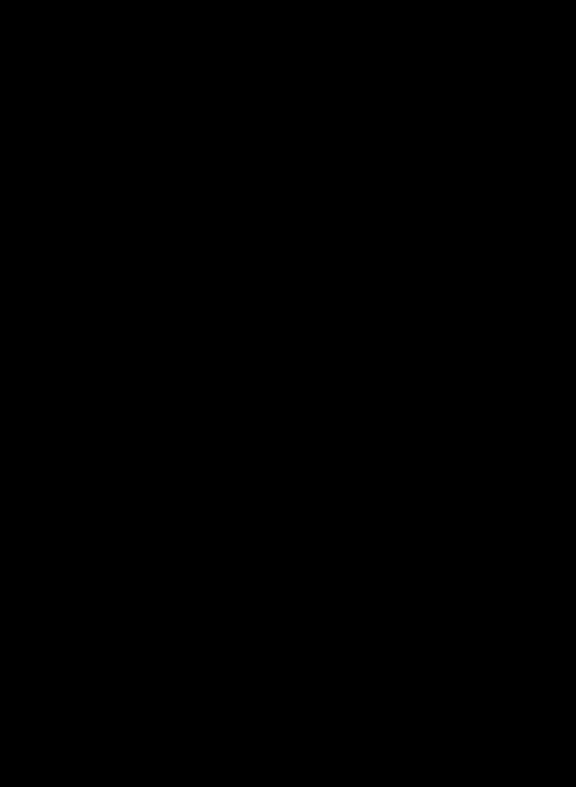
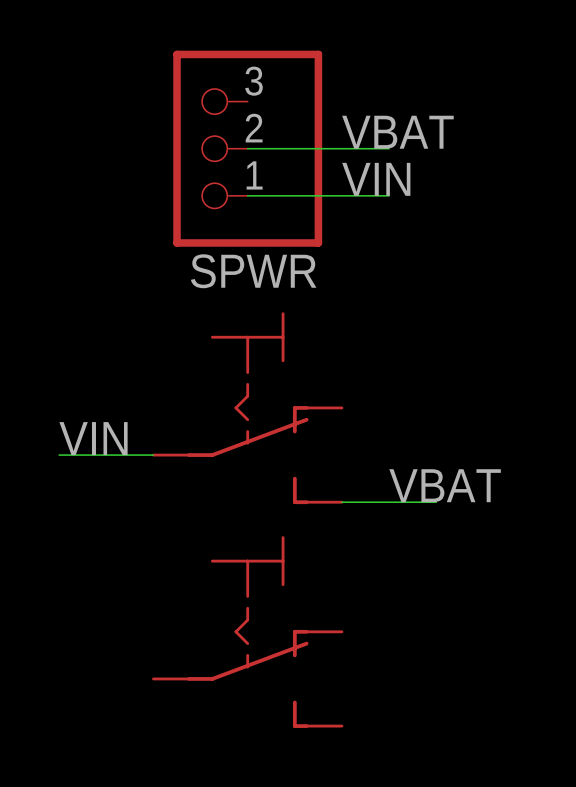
label: none -> VBAT (397, 132)
wire: none -> (247, 148) (389, 148)
SPWR: none -> (247, 148)
label: none -> VIN (376, 179)
wire: none -> (247, 195) (389, 195)
label: none -> VIN (93, 438)
wire: none -> (59, 455) (153, 455)
label: none -> VBAT (445, 485)
wire: none -> (341, 502) (436, 502)
part: none -> (247, 520)

